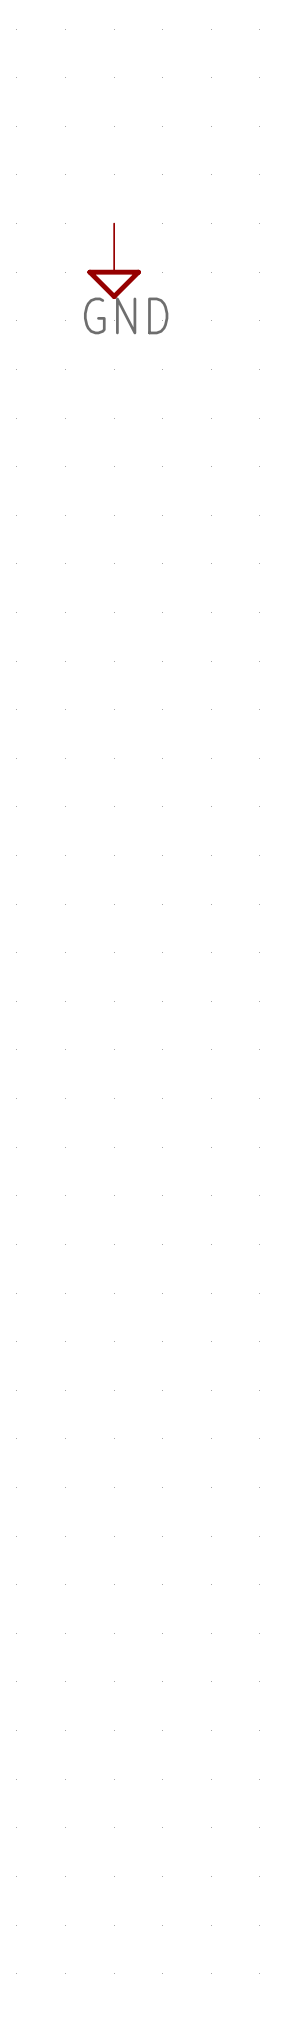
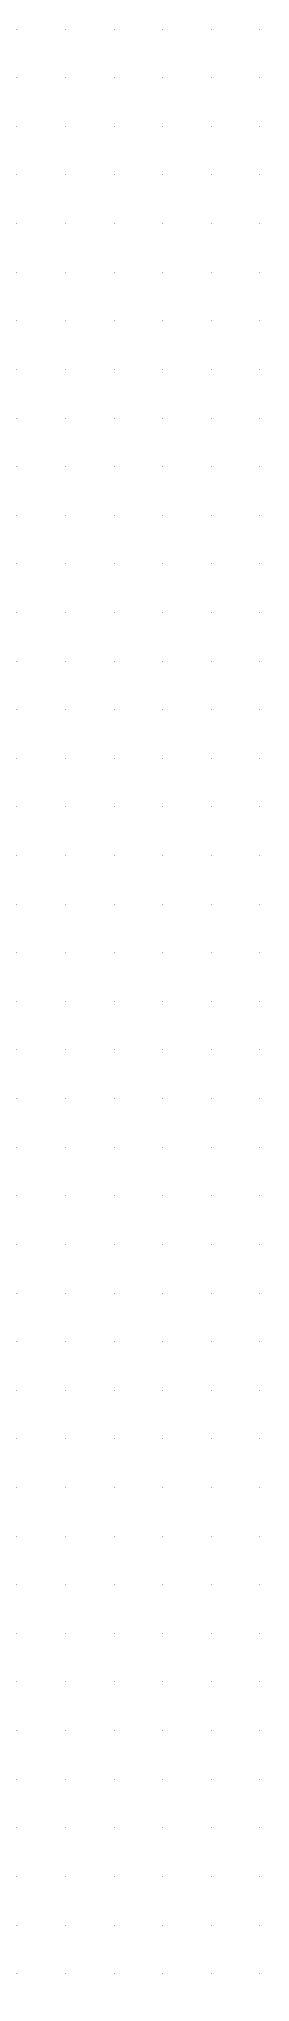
power symbol: GND (114, 261) -> none

